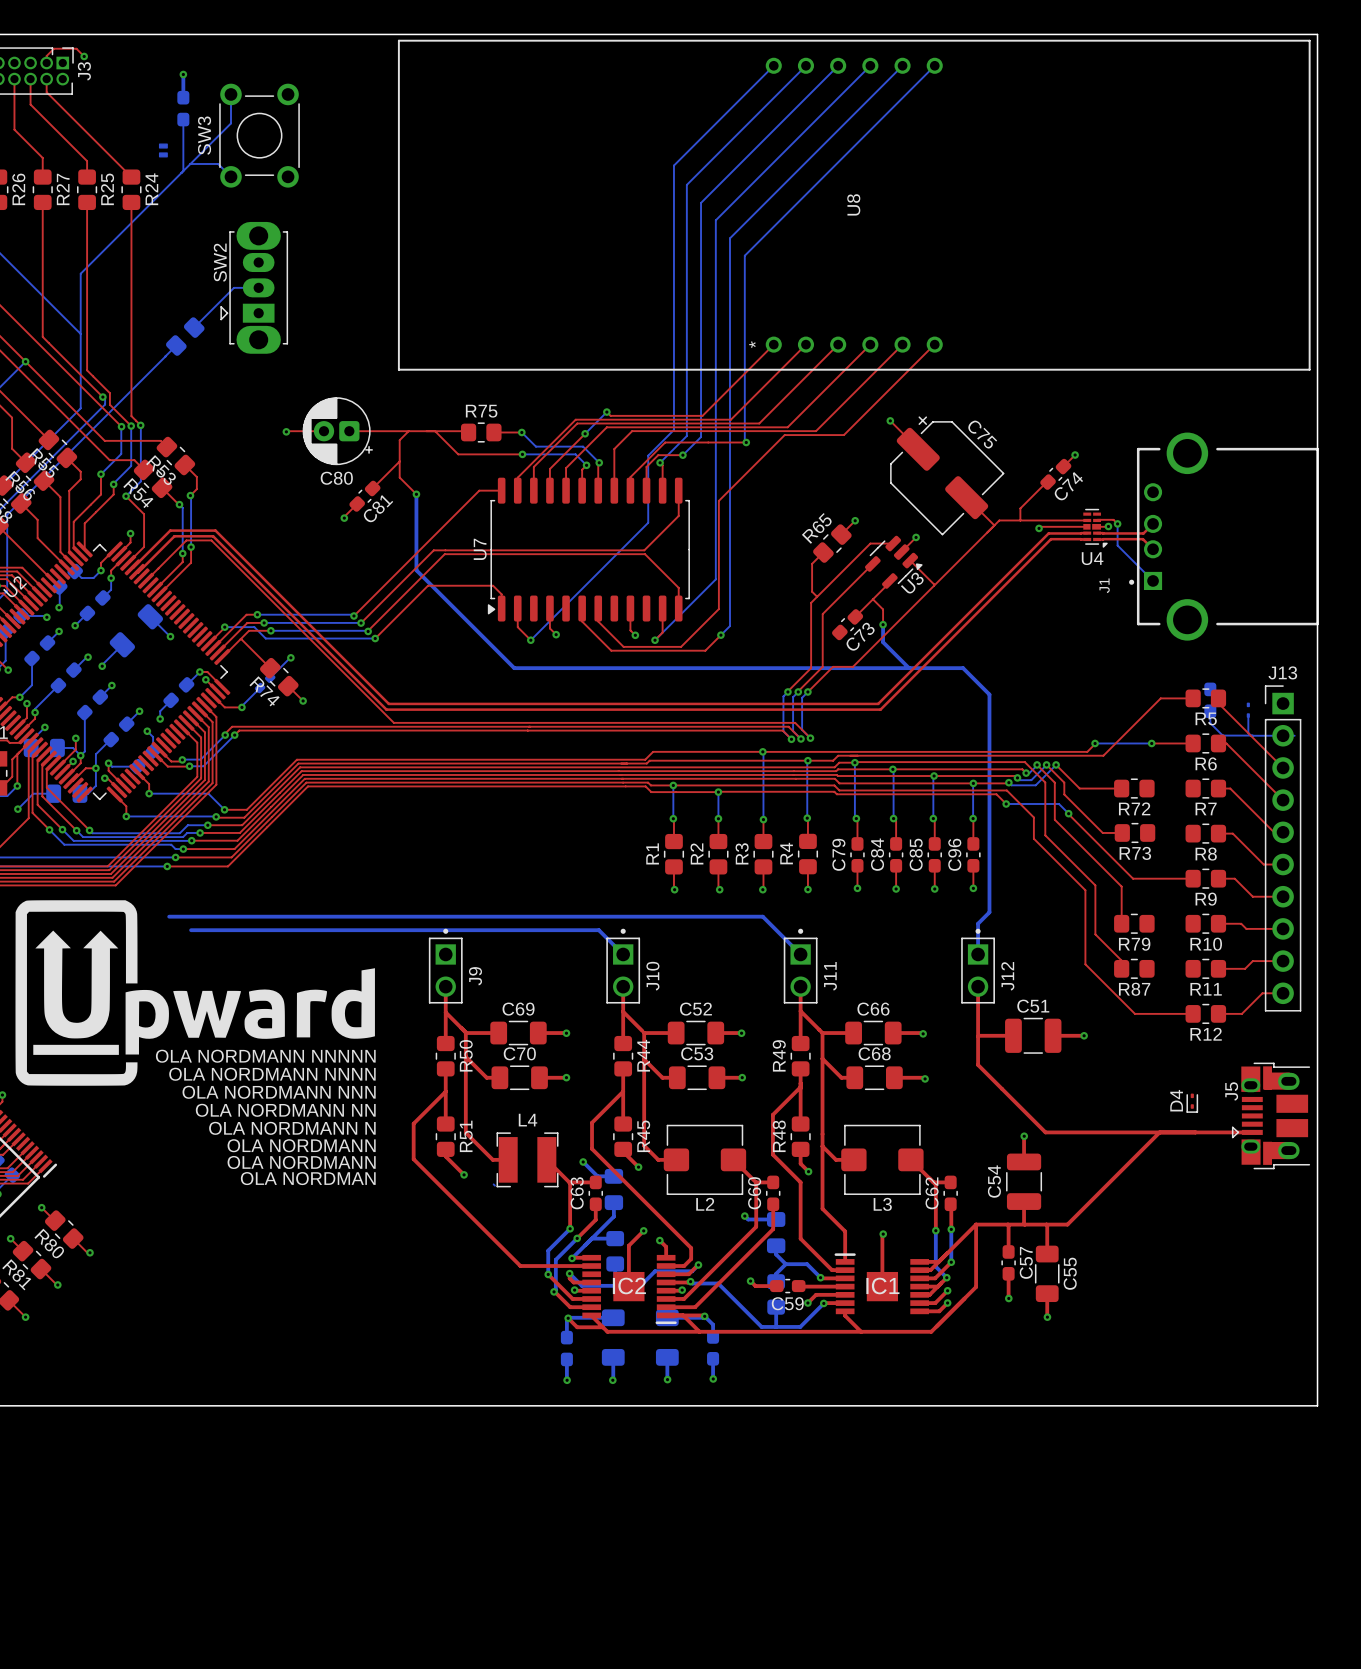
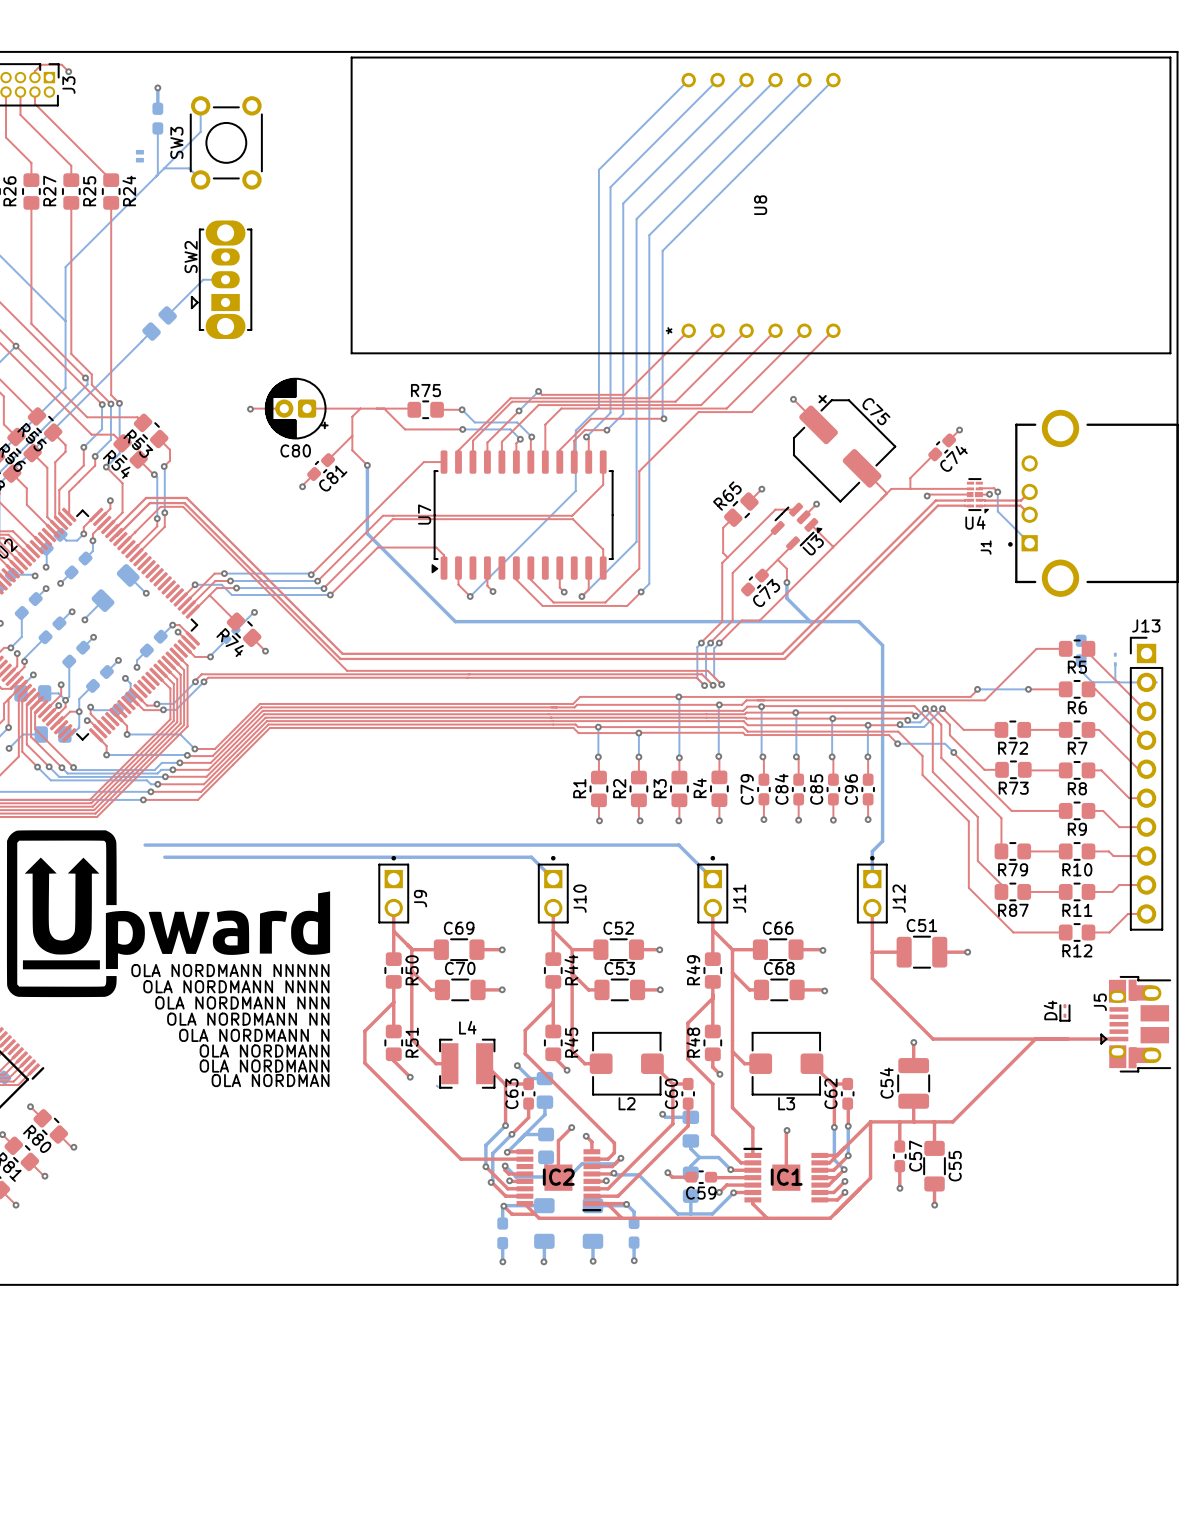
top track: none -> (1024, 729) (1065, 729)
top track: none -> (1024, 769) (1065, 770)
top track: none -> (1024, 851) (1065, 851)
top track: none -> (1024, 891) (1065, 891)

